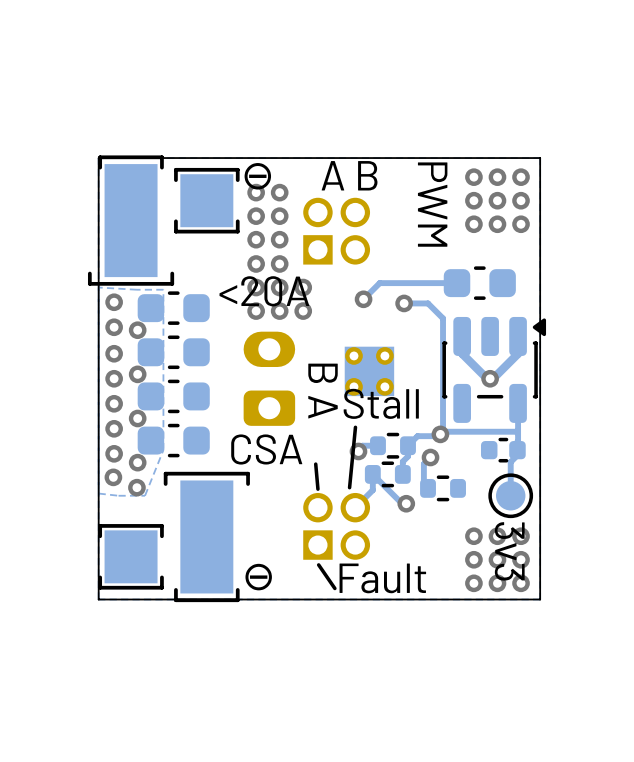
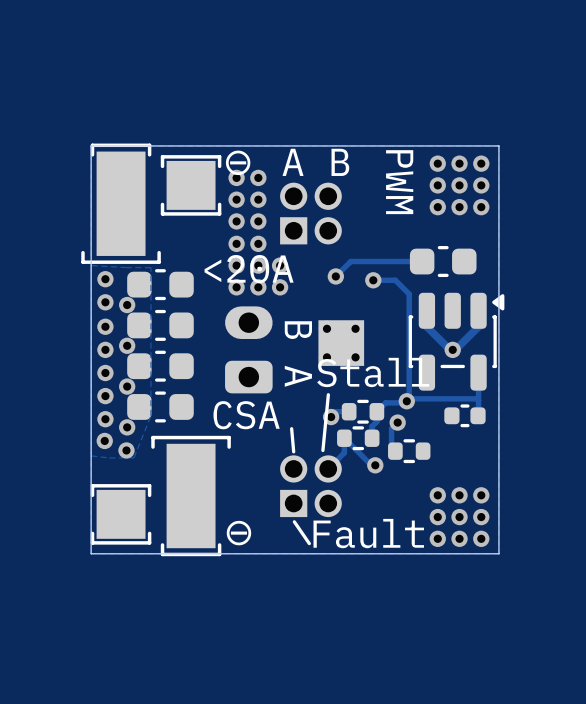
track: (517, 455) (510, 462) (510, 495) -> none
part: (510, 495) -> none
text: 3v3 (509, 551) -> none

